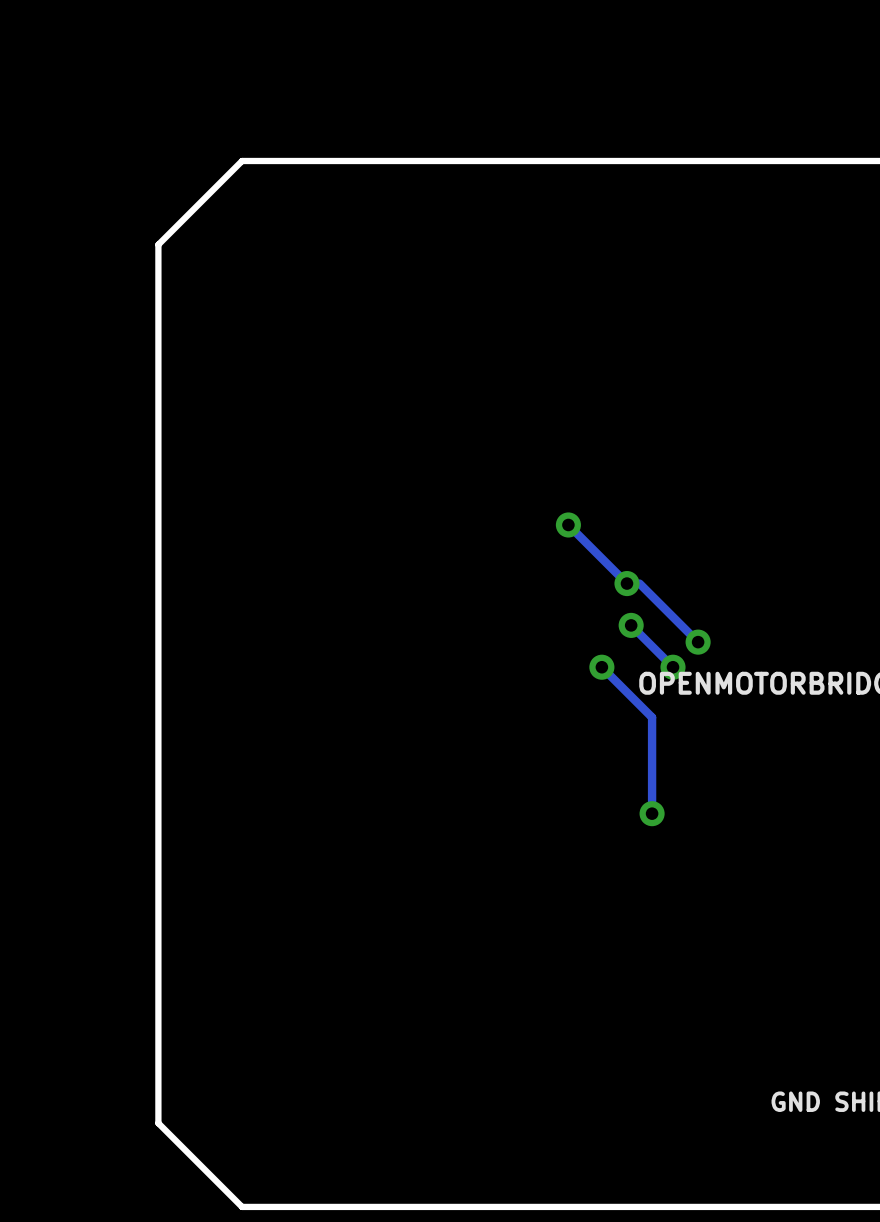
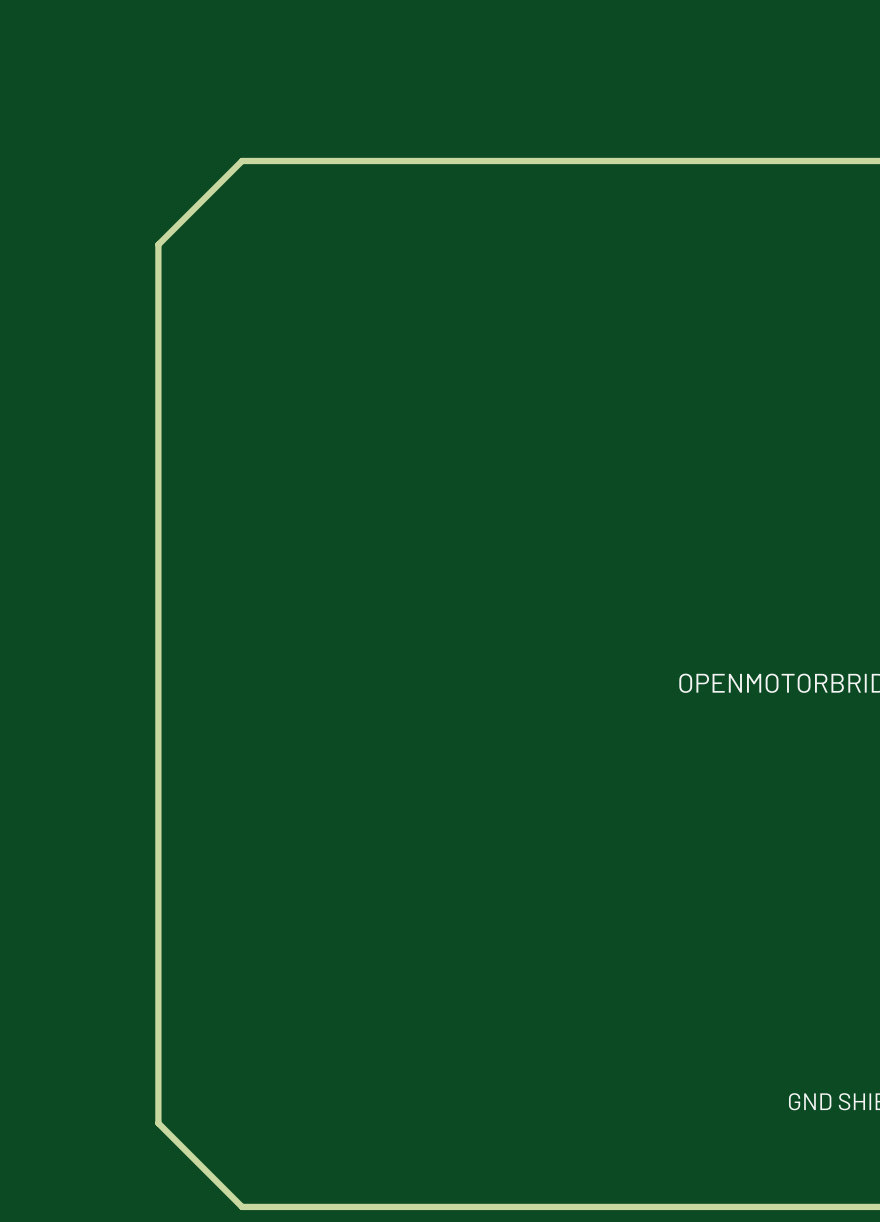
track: (568, 524) (626, 583) -> none
via: (568, 524) -> none
via: (626, 583) -> none
track: (639, 583) (698, 642) -> none
track: (631, 625) (673, 667) -> none
via: (631, 625) -> none
via: (698, 642) -> none
track: (601, 667) (652, 717) (652, 813) -> none
via: (601, 667) -> none
via: (673, 667) -> none
via: (652, 813) -> none

